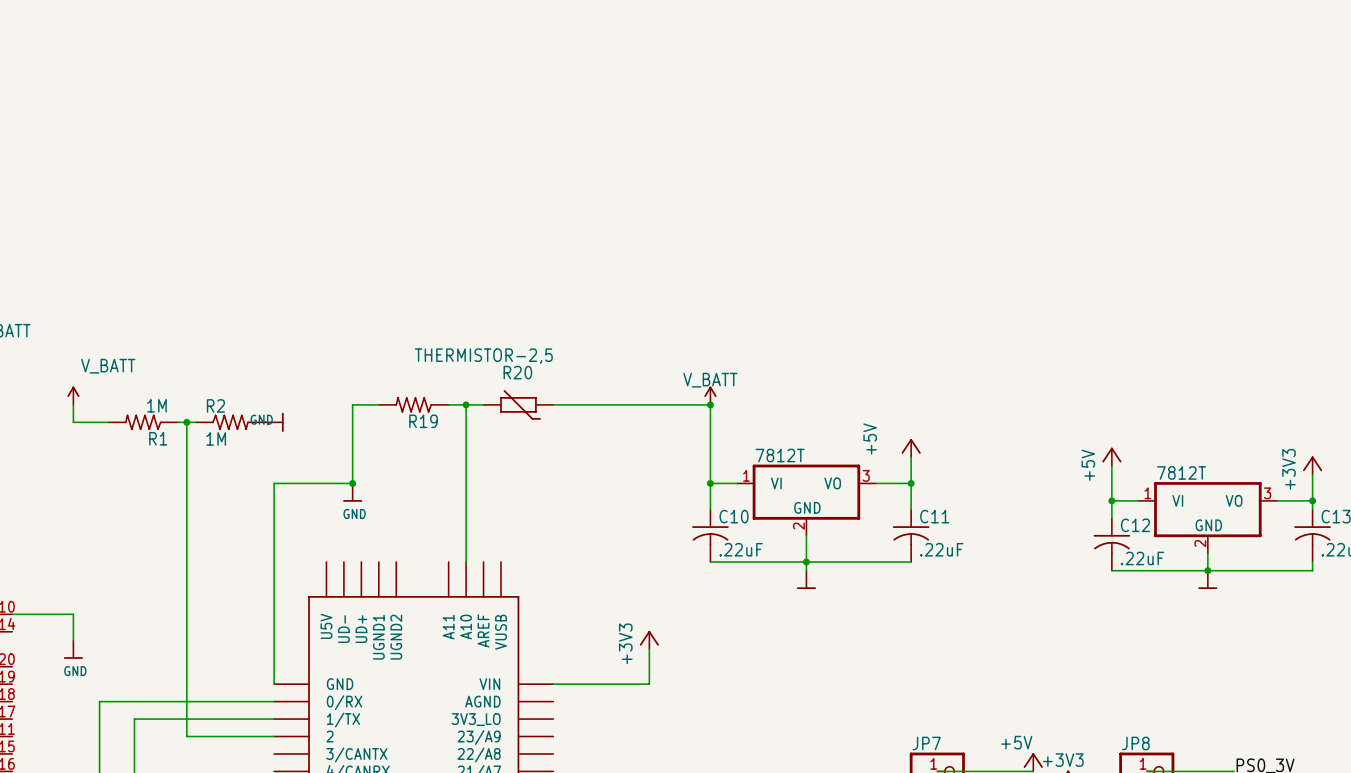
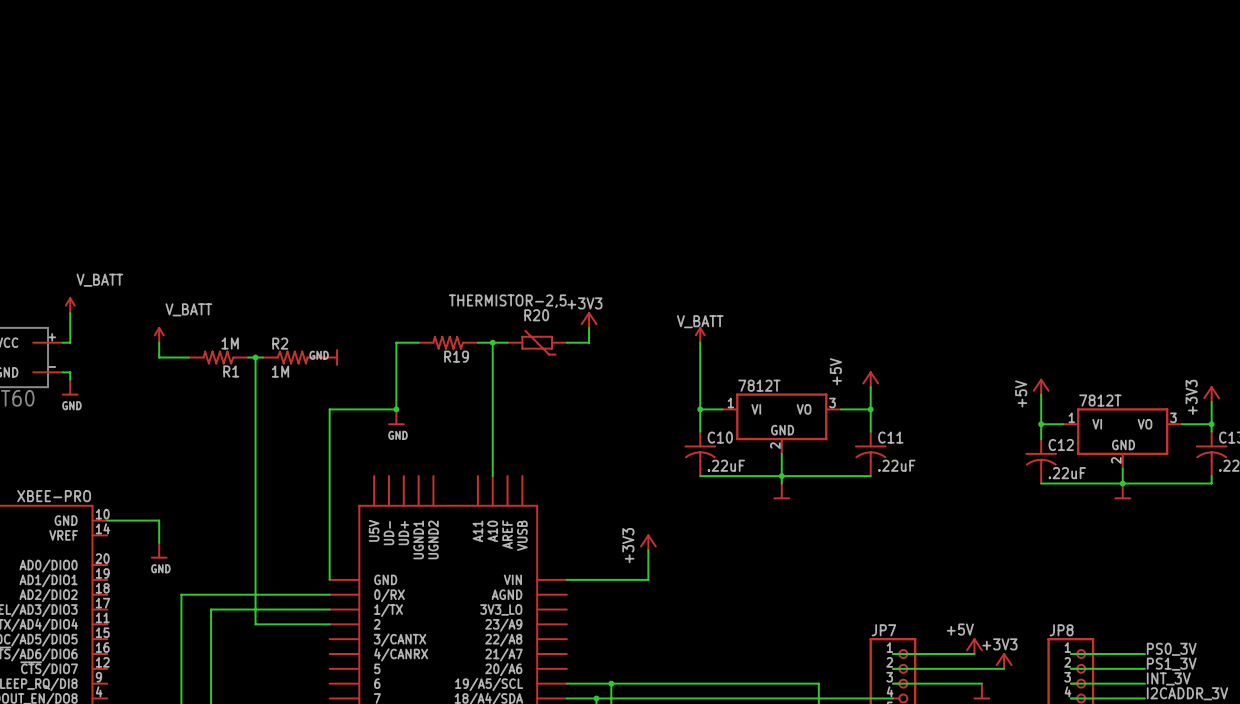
power symbol: none -> +3V3 (589, 320)
wire: (579, 404) (710, 404) -> (589, 342) (589, 327)
junction: (710, 404) -> none

